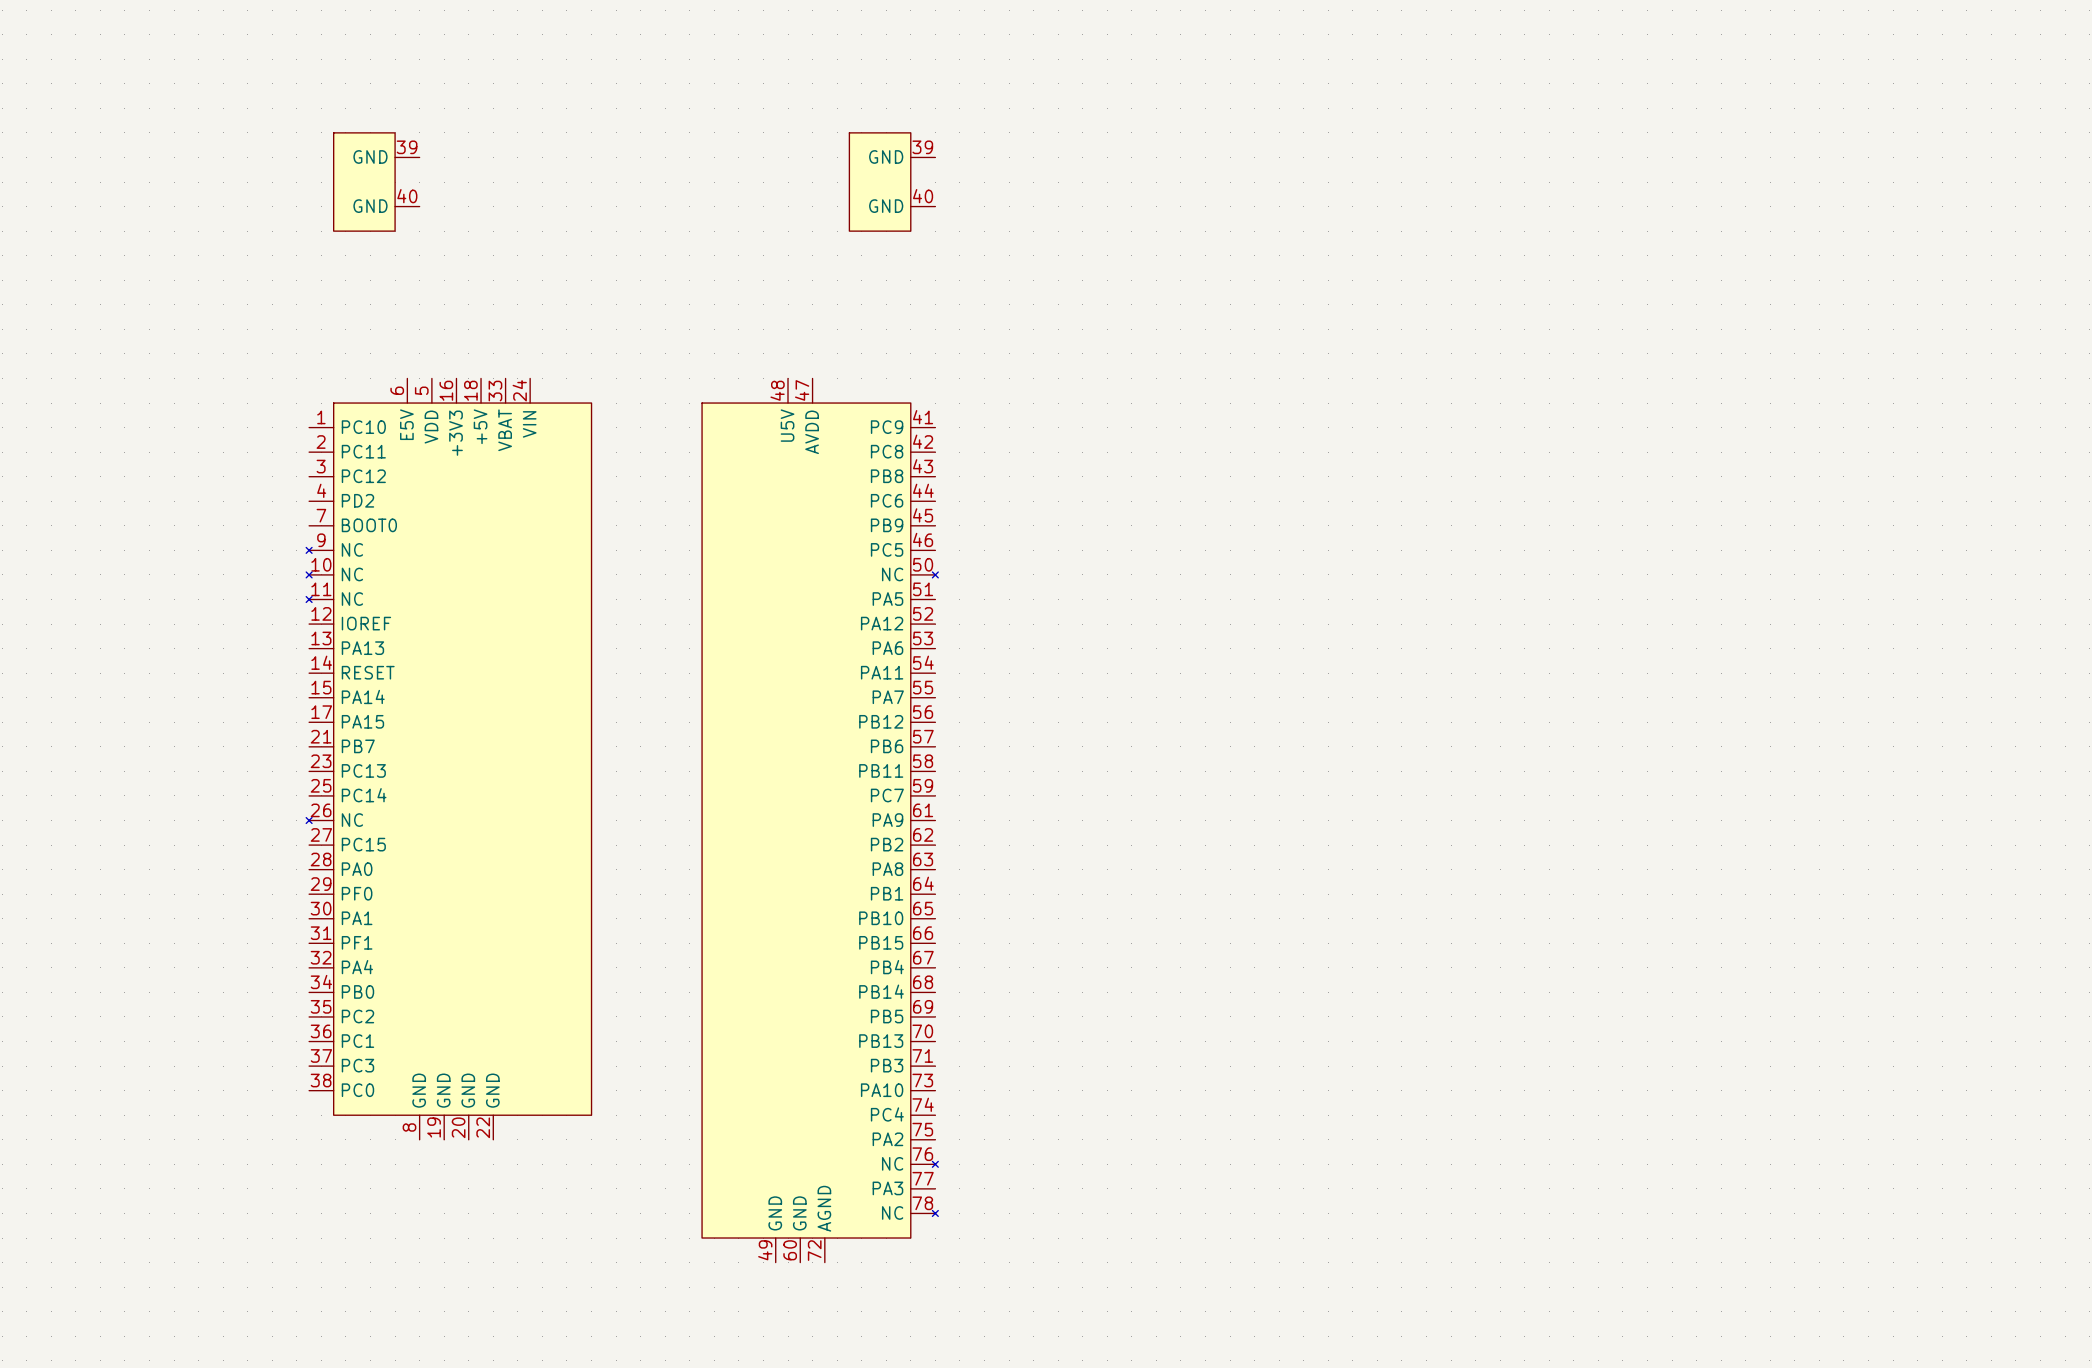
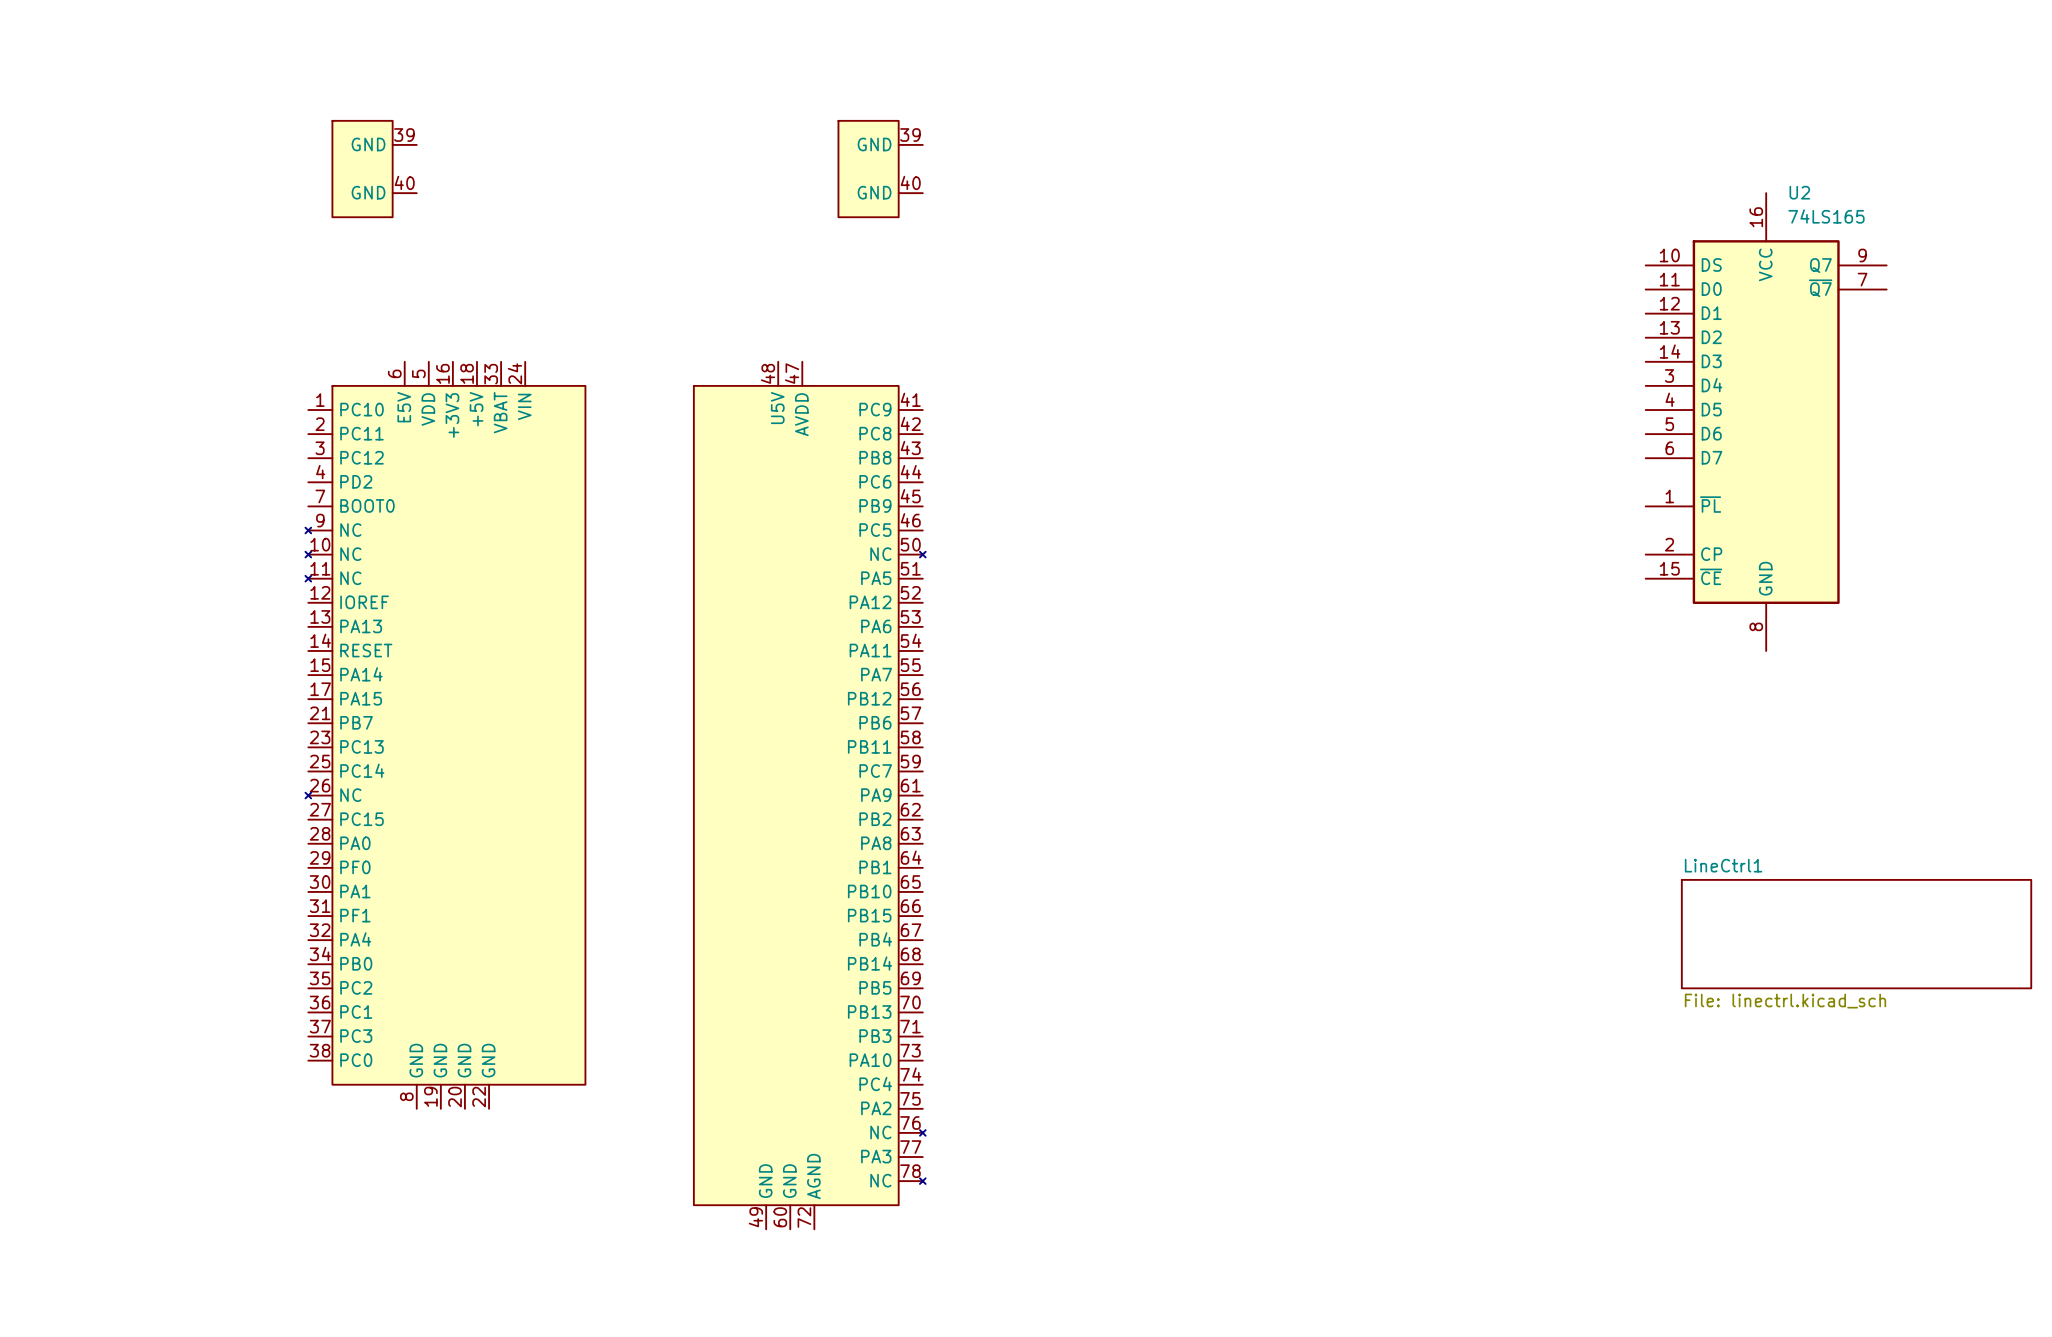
U2: none -> 74LS165 (1766, 422)
sheet LineCtrl1: none -> File: linectrl.kicad_sch (1856, 934)

